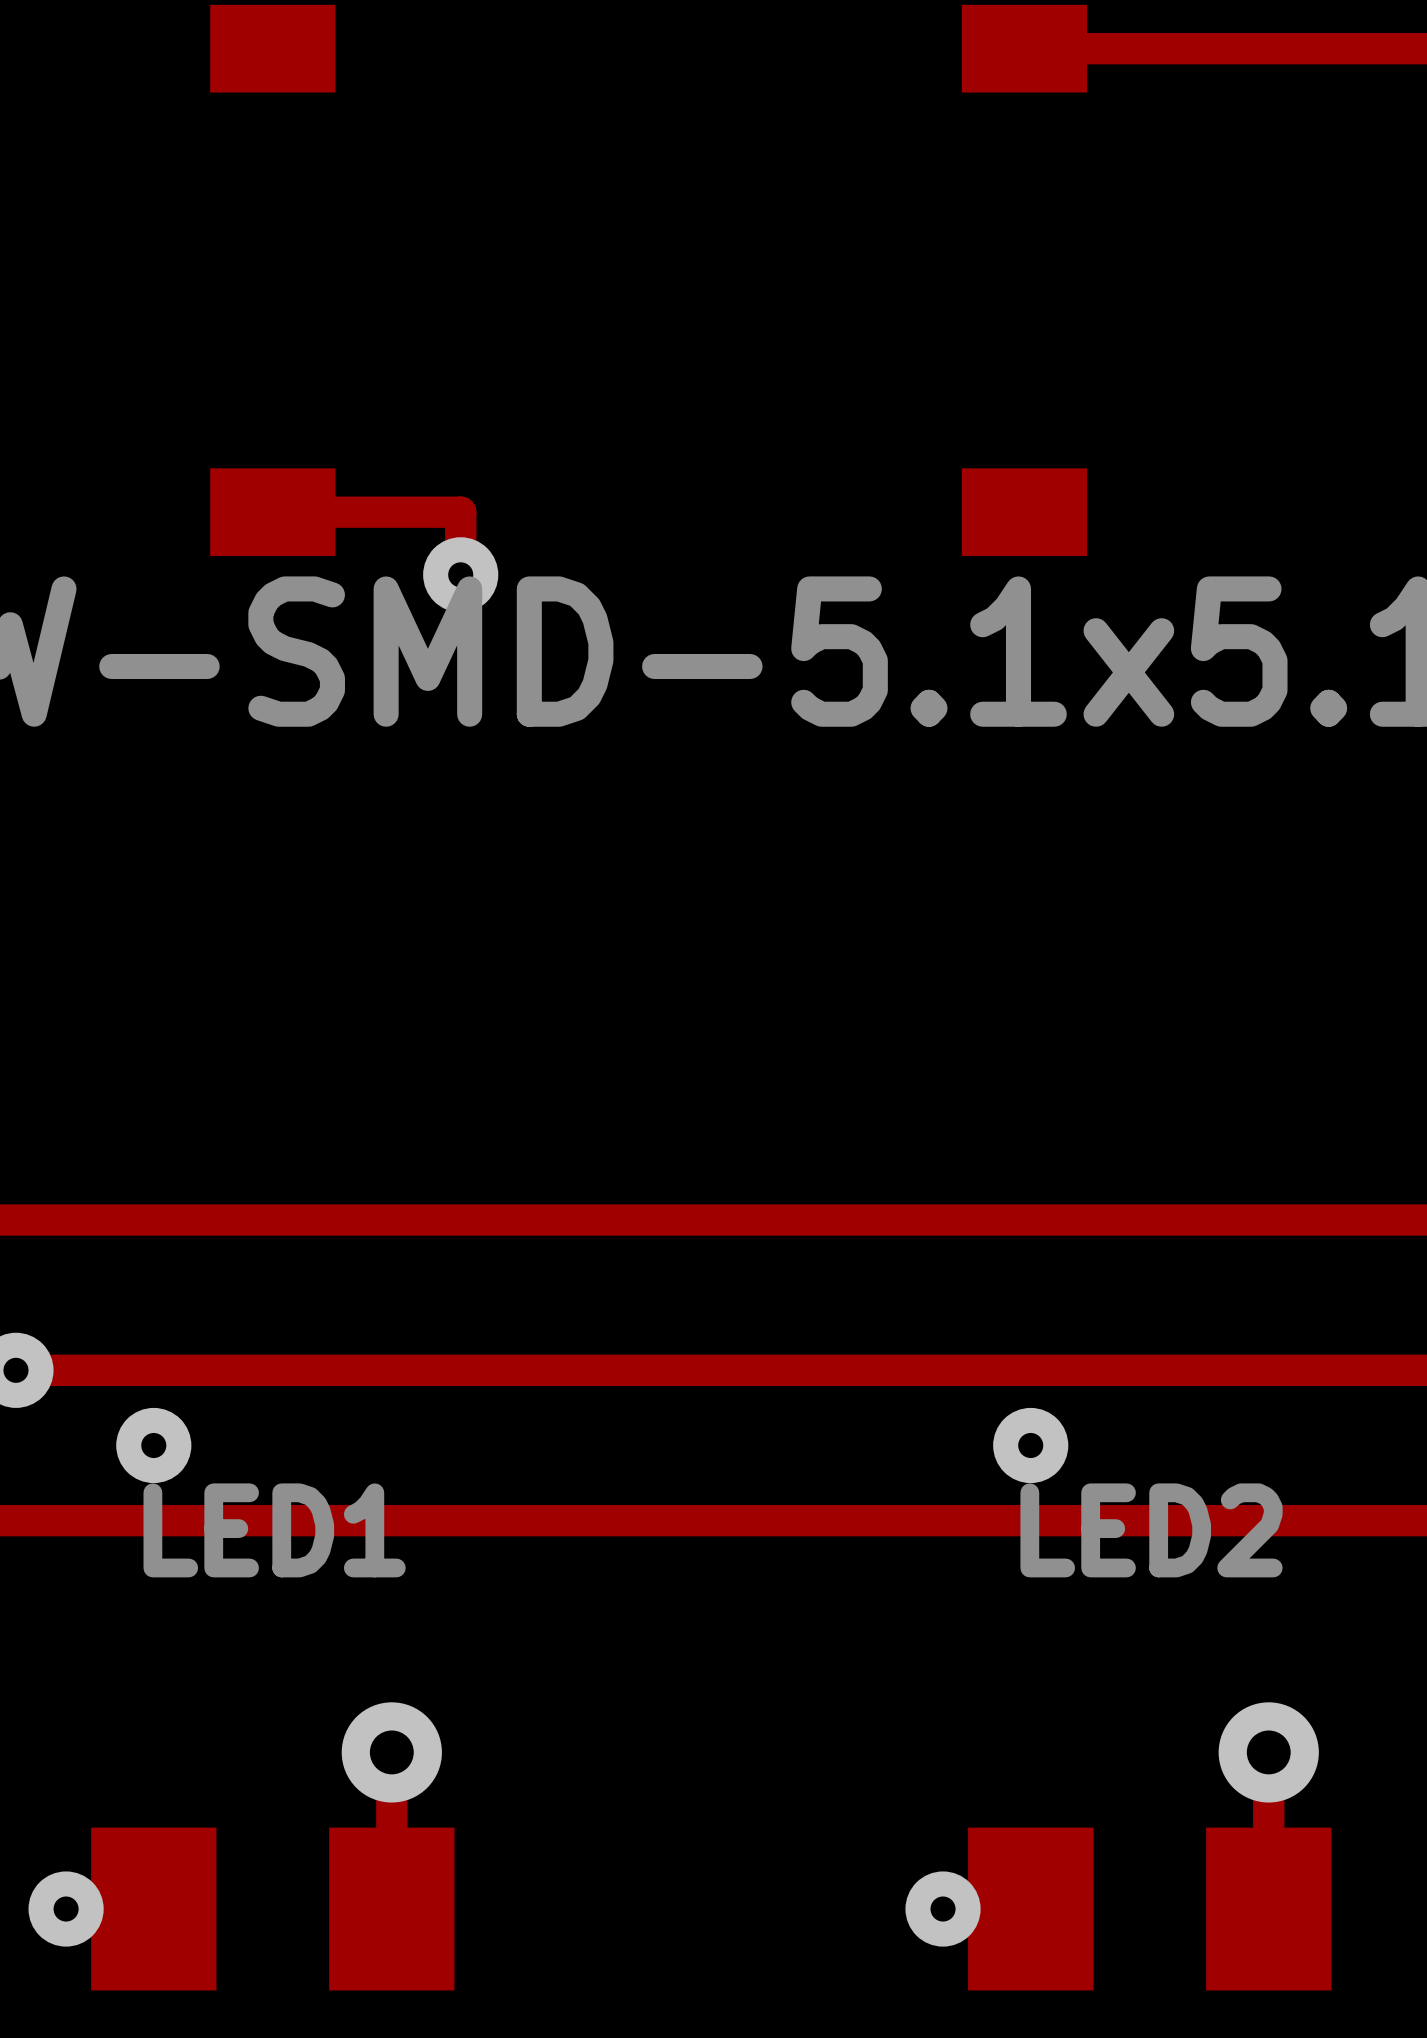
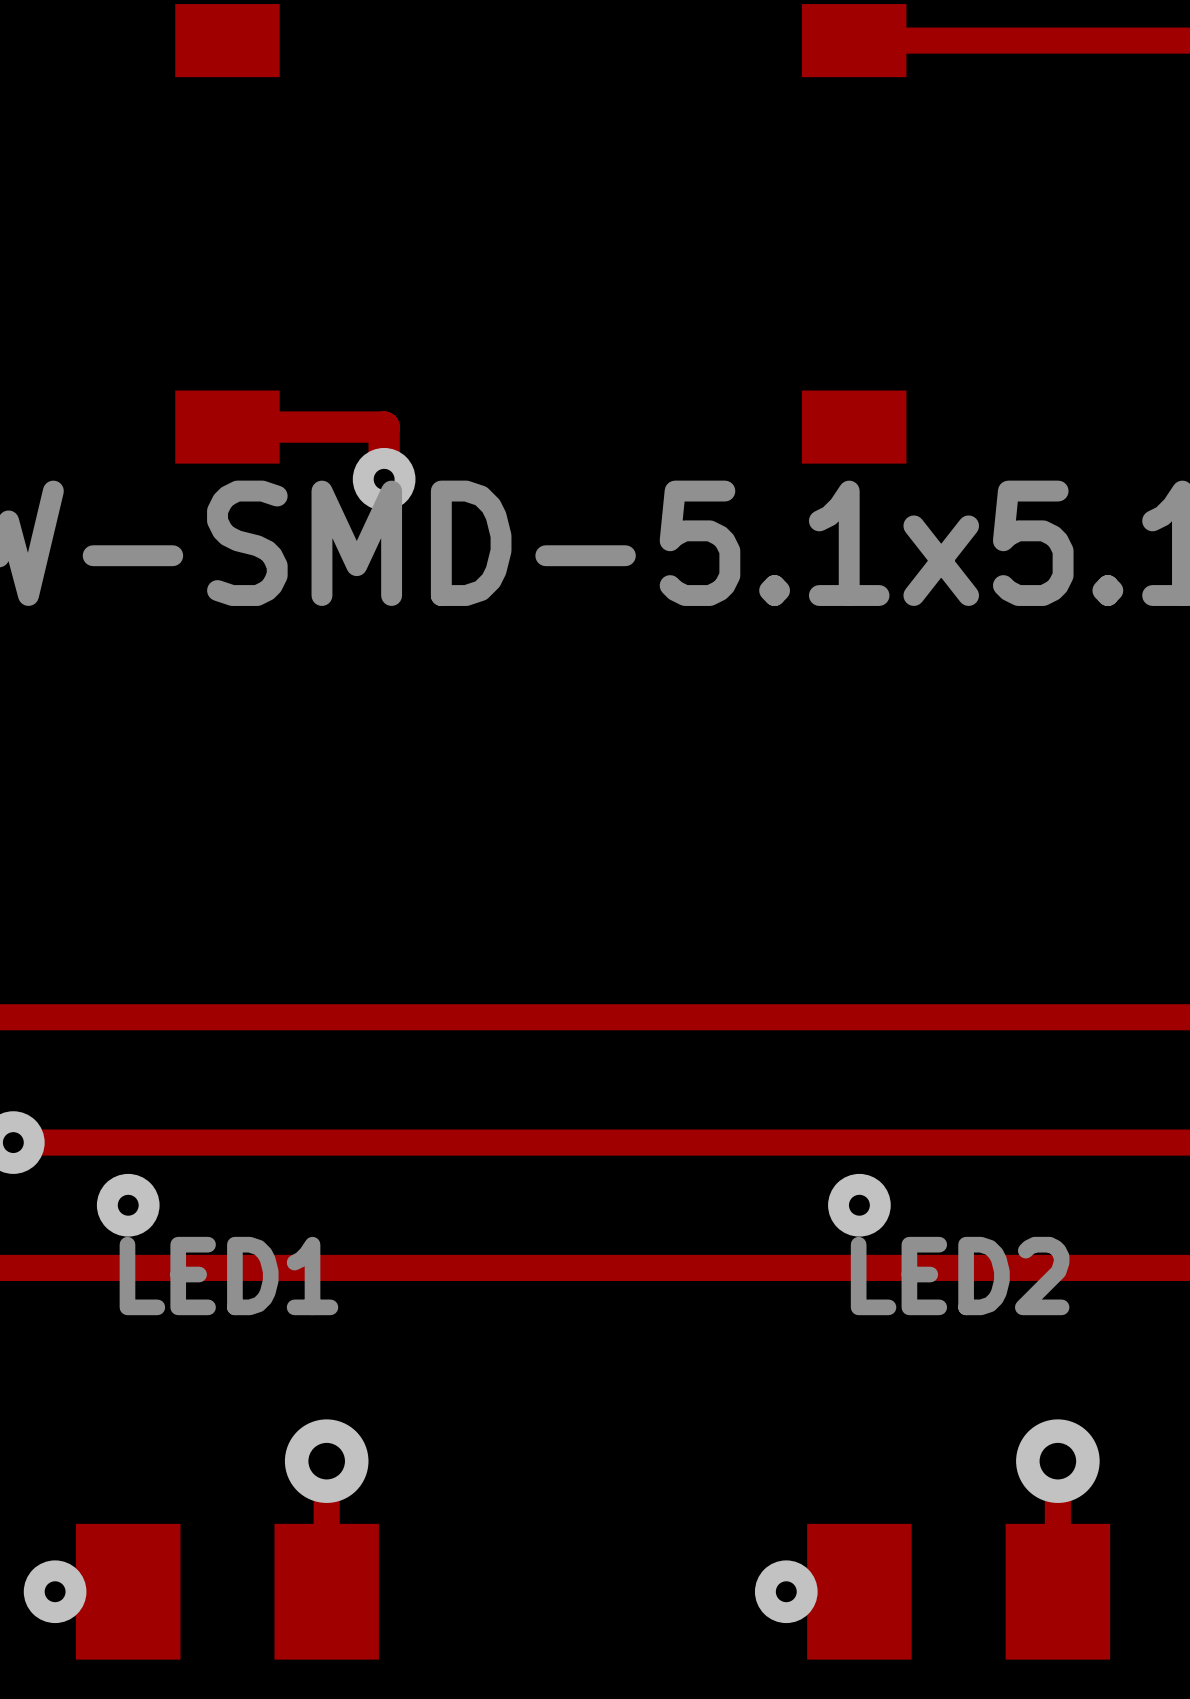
track width: thin (272, 512) (460, 512) (460, 574) -> thick (227, 427) (384, 427) (384, 479)

